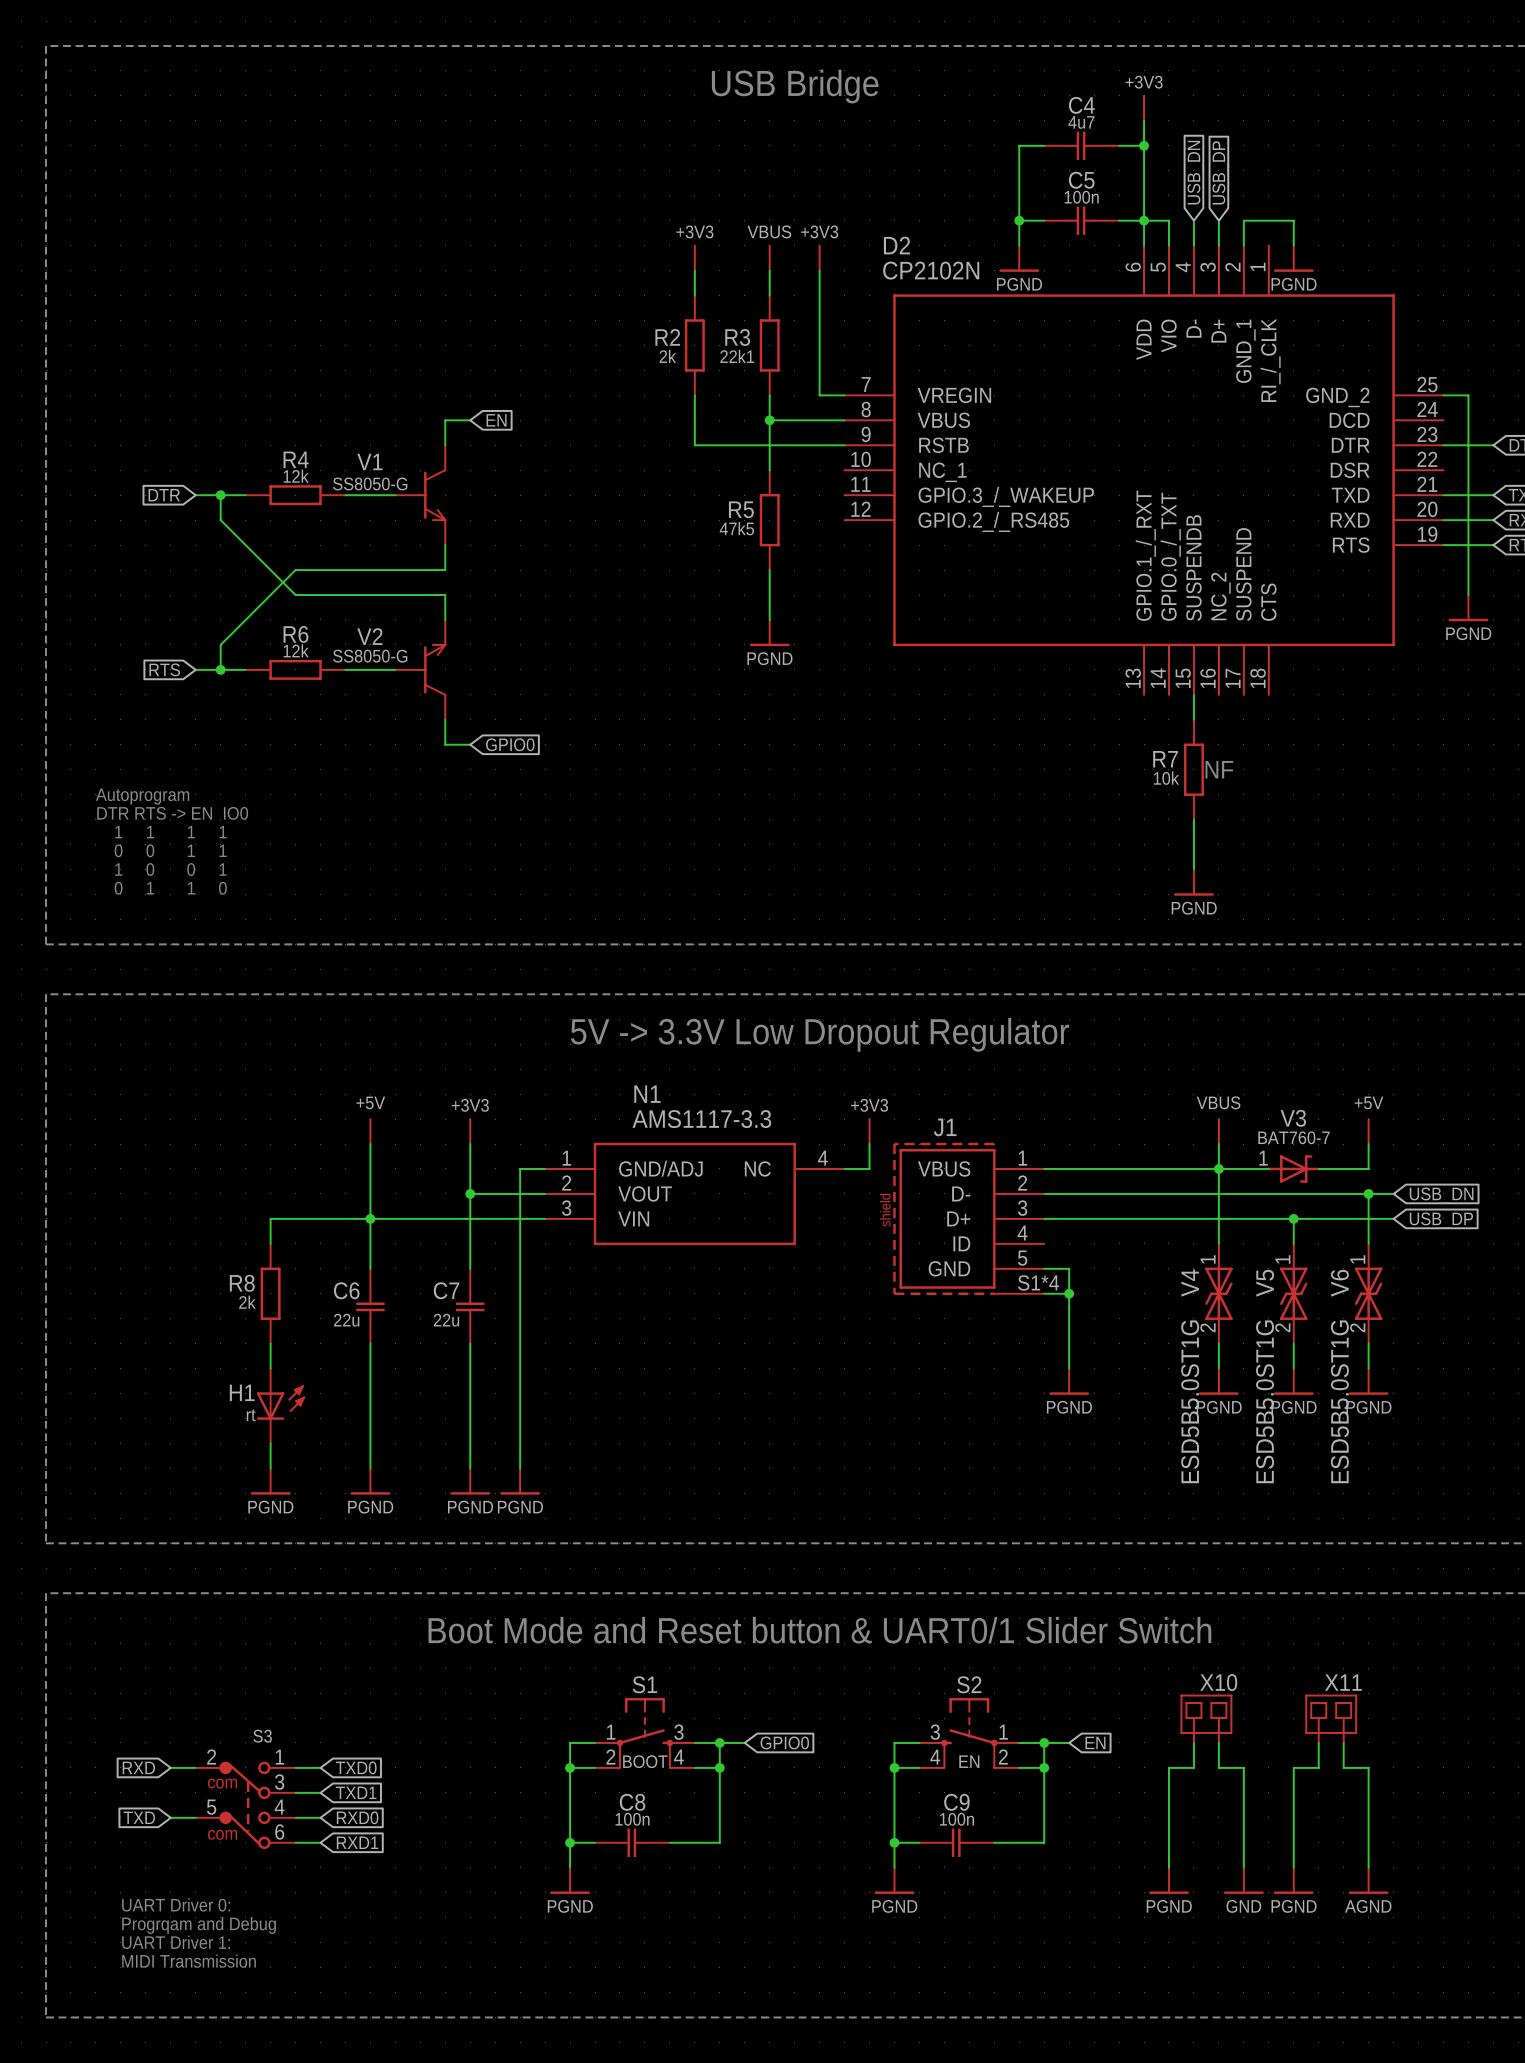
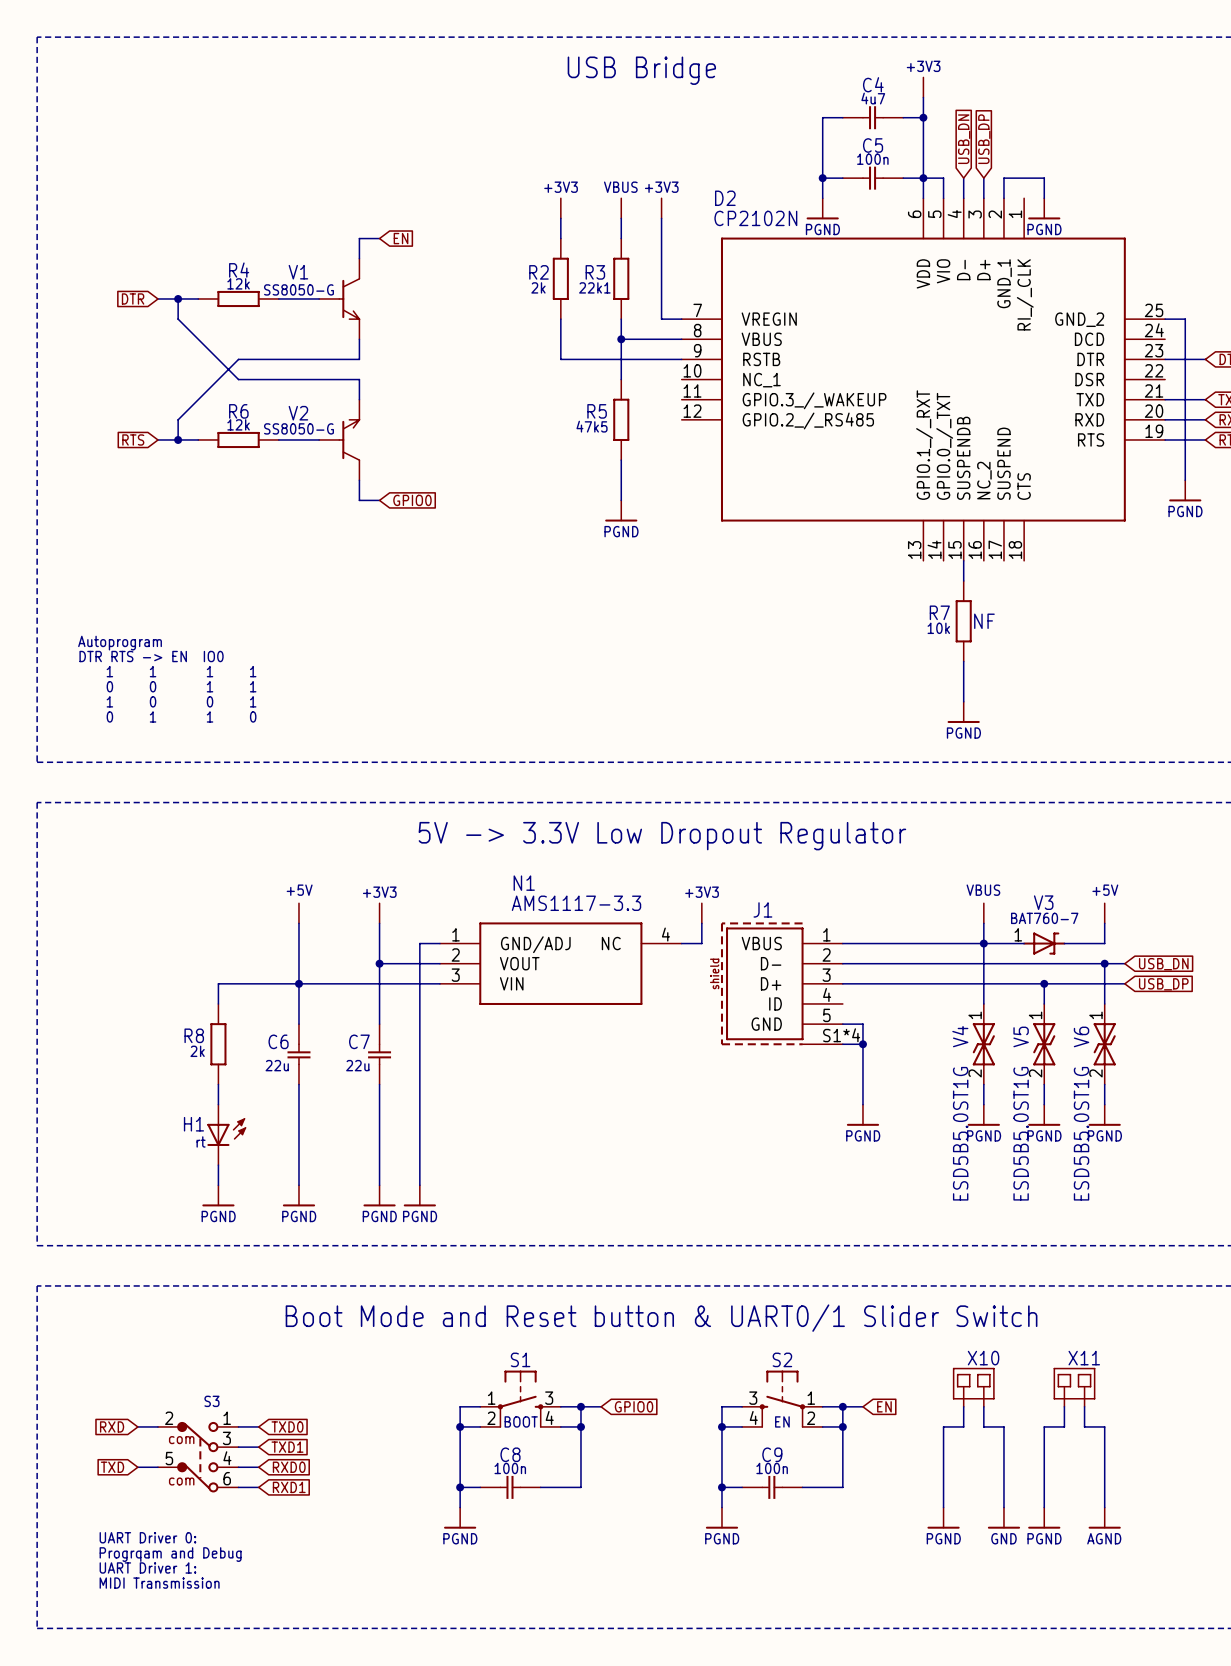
wire: none -> (379, 238) (359, 238) (359, 258)
wire: none -> (178, 298) (178, 319) (238, 379) (359, 379) (359, 399)
junction: none -> (178, 298)
wire: (445, 420) (470, 420) -> (359, 500) (379, 500)
global label position: EN (496, 420) -> EN (401, 238)
wire: none -> (359, 359) (238, 359) (178, 419) (178, 439)
global label position: DTR (164, 495) -> DTR (133, 298)
wire: (195, 495) (245, 495) -> (157, 298) (198, 298)
wire: (220, 495) (220, 520) (295, 595) (445, 595) -> none
junction position: (220, 495) -> (178, 439)
R4 position: (295, 495) -> (238, 298)
wire: (345, 495) (395, 495) -> (278, 298) (319, 298)
V1 position: (420, 495) -> (339, 298)
wire: (445, 545) (445, 570) (295, 570) (220, 644) (220, 669) -> none
global label position: RTS (164, 669) -> RTS (133, 439)
wire: (195, 669) (245, 669) -> (157, 439) (198, 439)
junction: (220, 669) -> none
R6 position: (295, 669) -> (238, 439)
wire: (345, 669) (395, 669) -> (278, 439) (319, 439)
V2 position: (420, 669) -> (339, 439)
wire: (445, 719) (445, 744) (470, 744) -> none
global label position: GPIO0 (510, 744) -> GPIO0 (412, 500)

